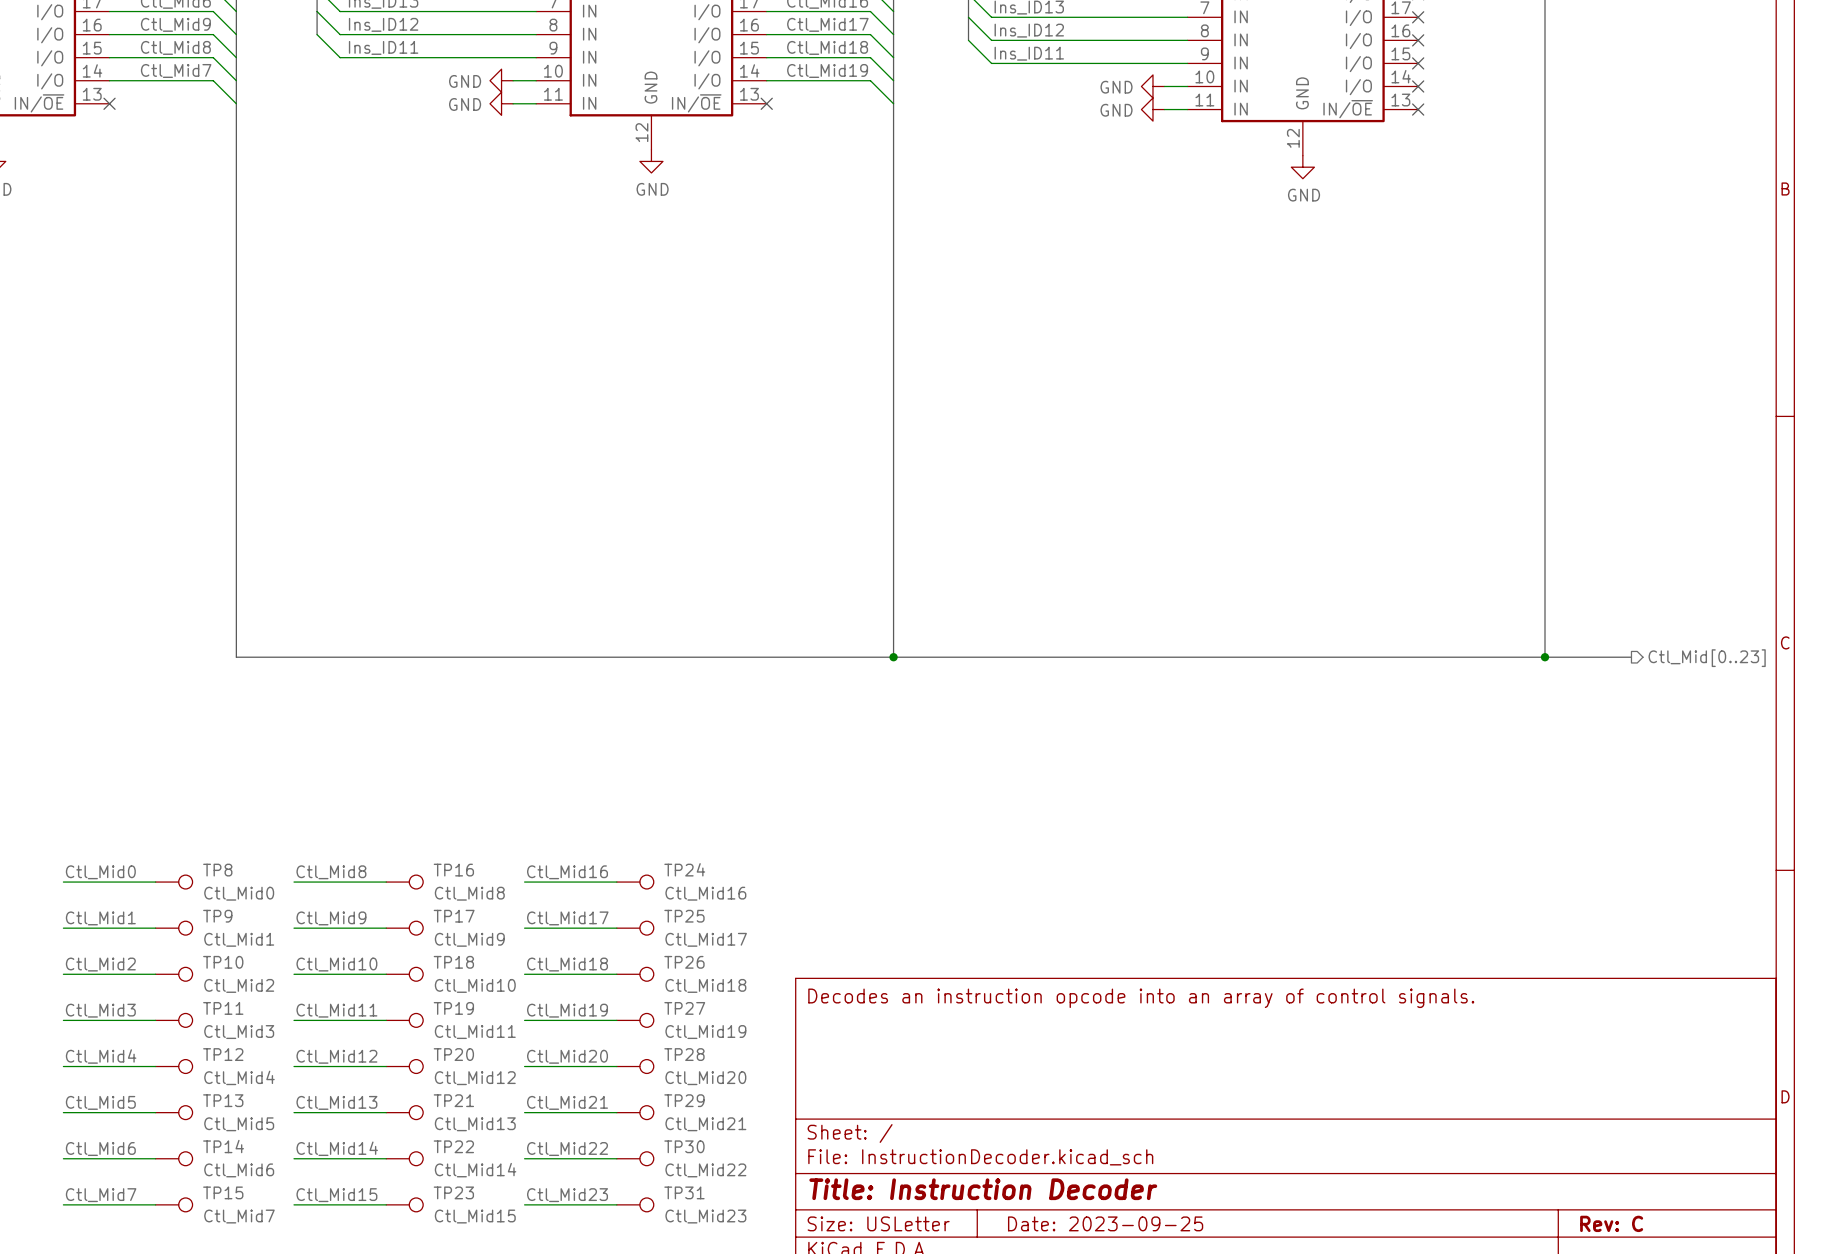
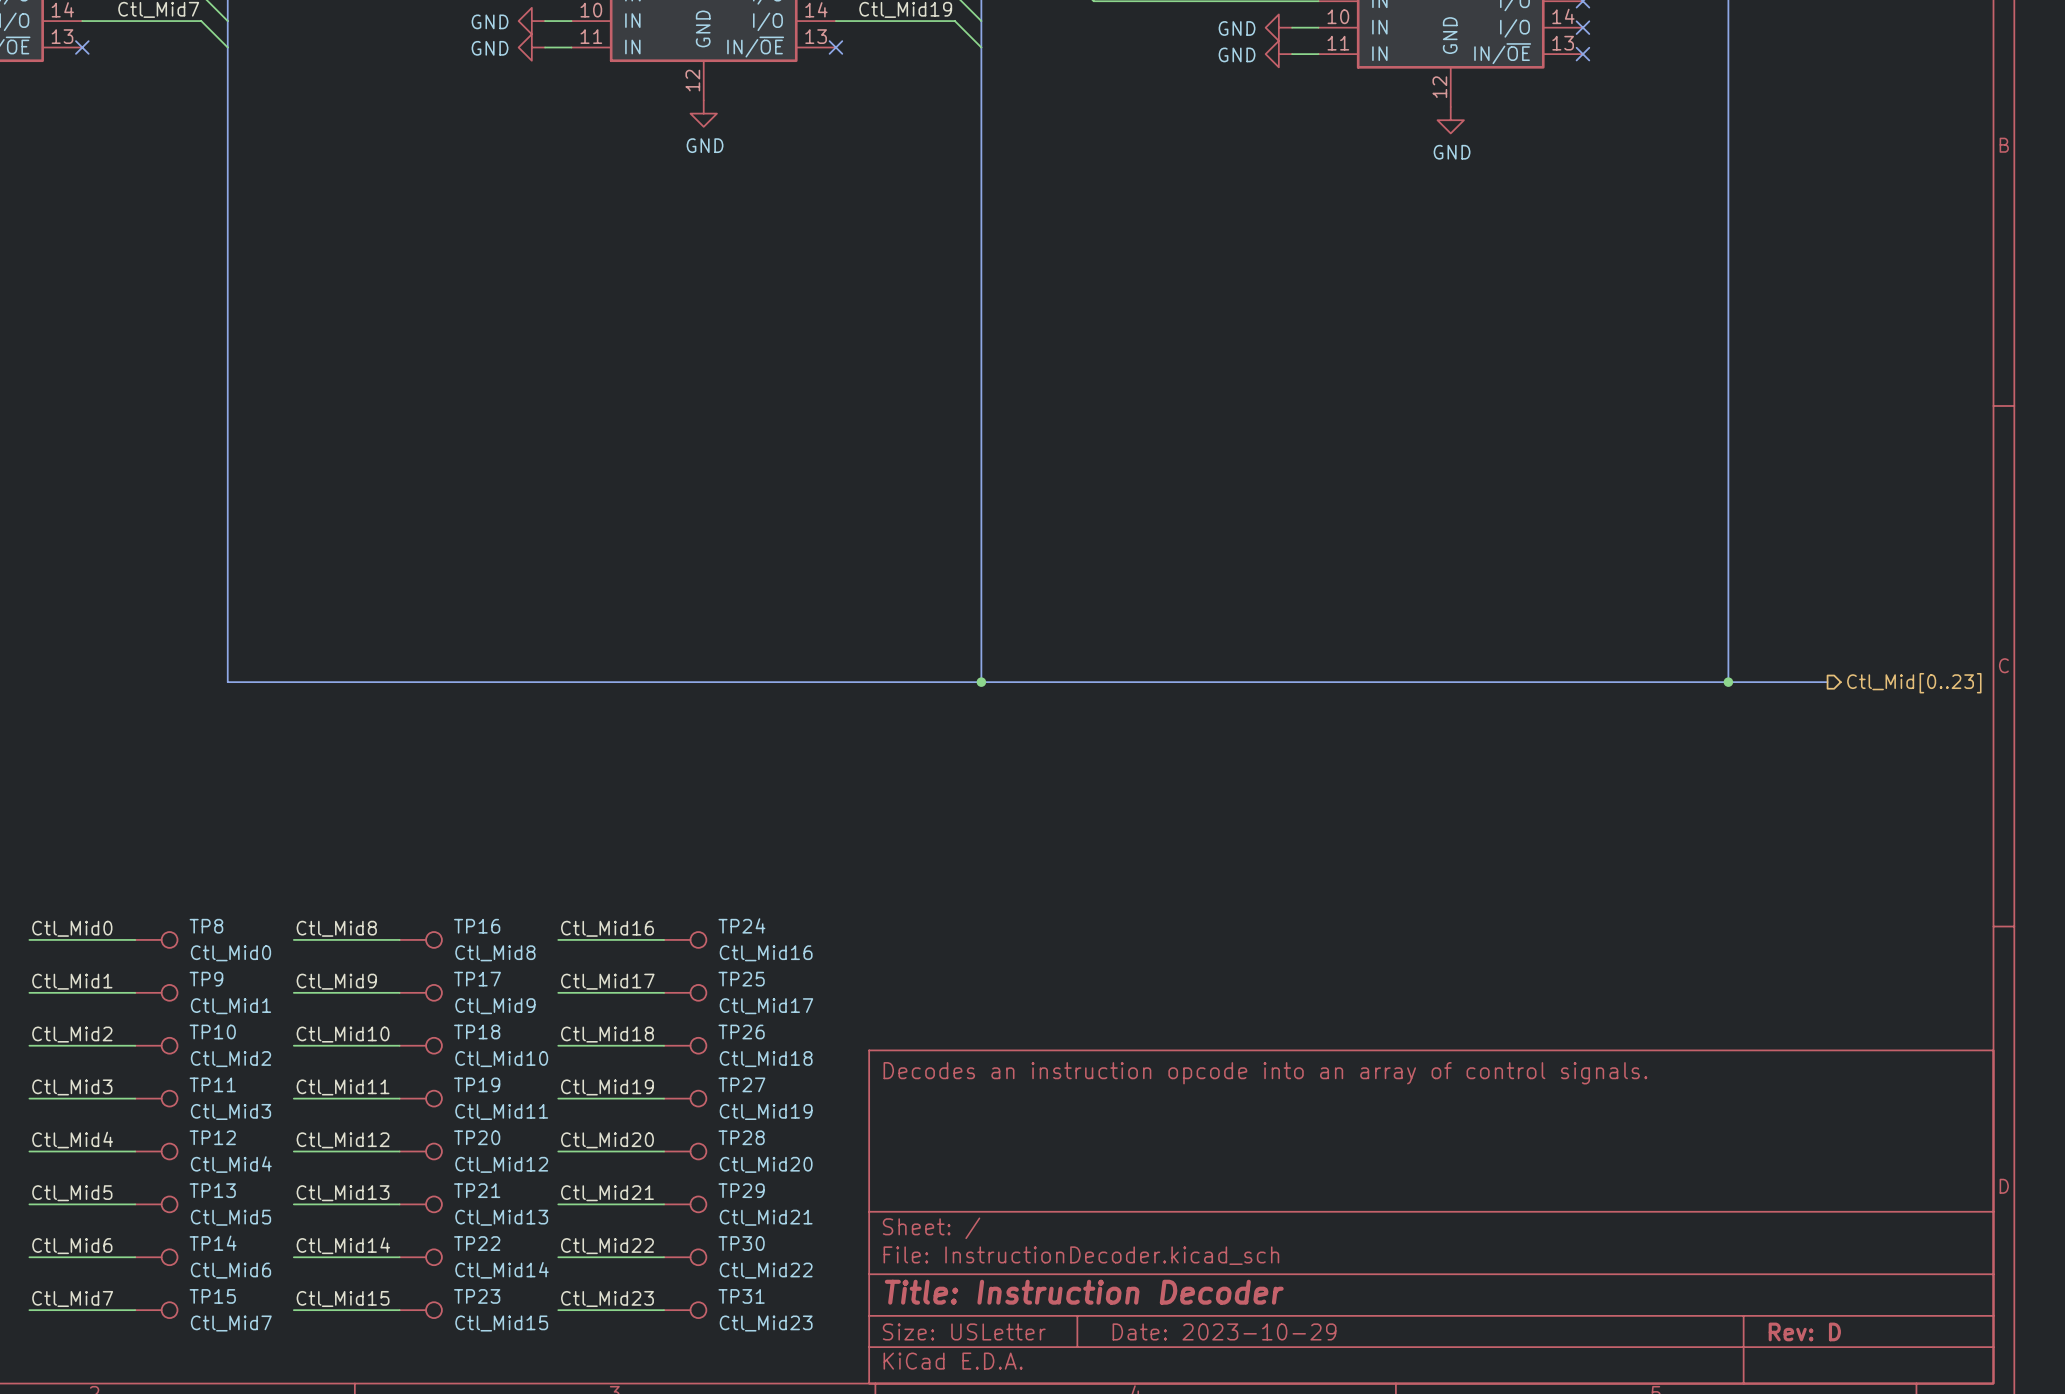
title block: Date: 2023-09-25 (1105, 1223) -> Date: 2023-10-29 (1224, 1331)
title block: Rev: C (1611, 1223) -> Rev: D (1804, 1331)

